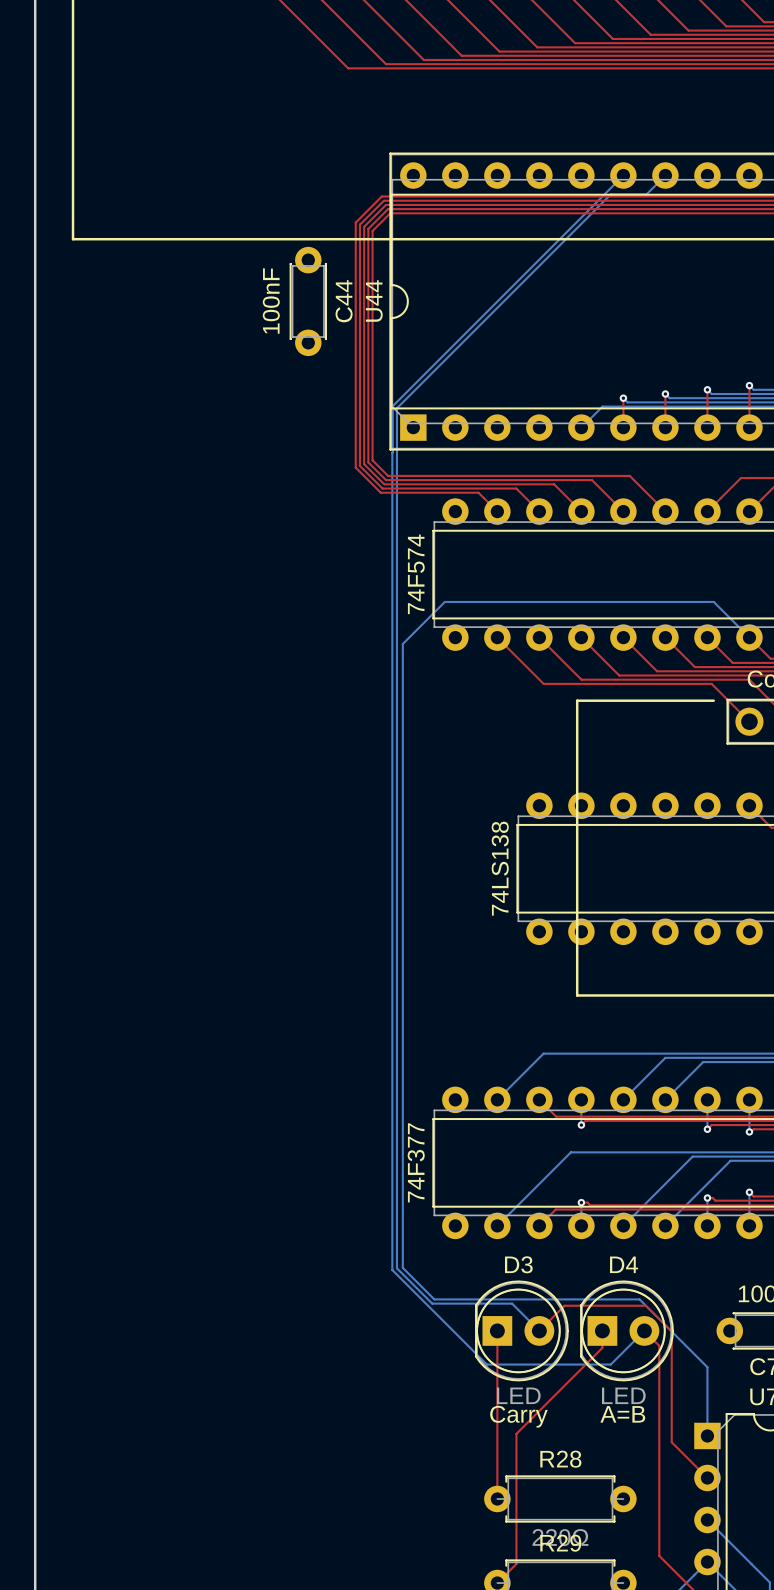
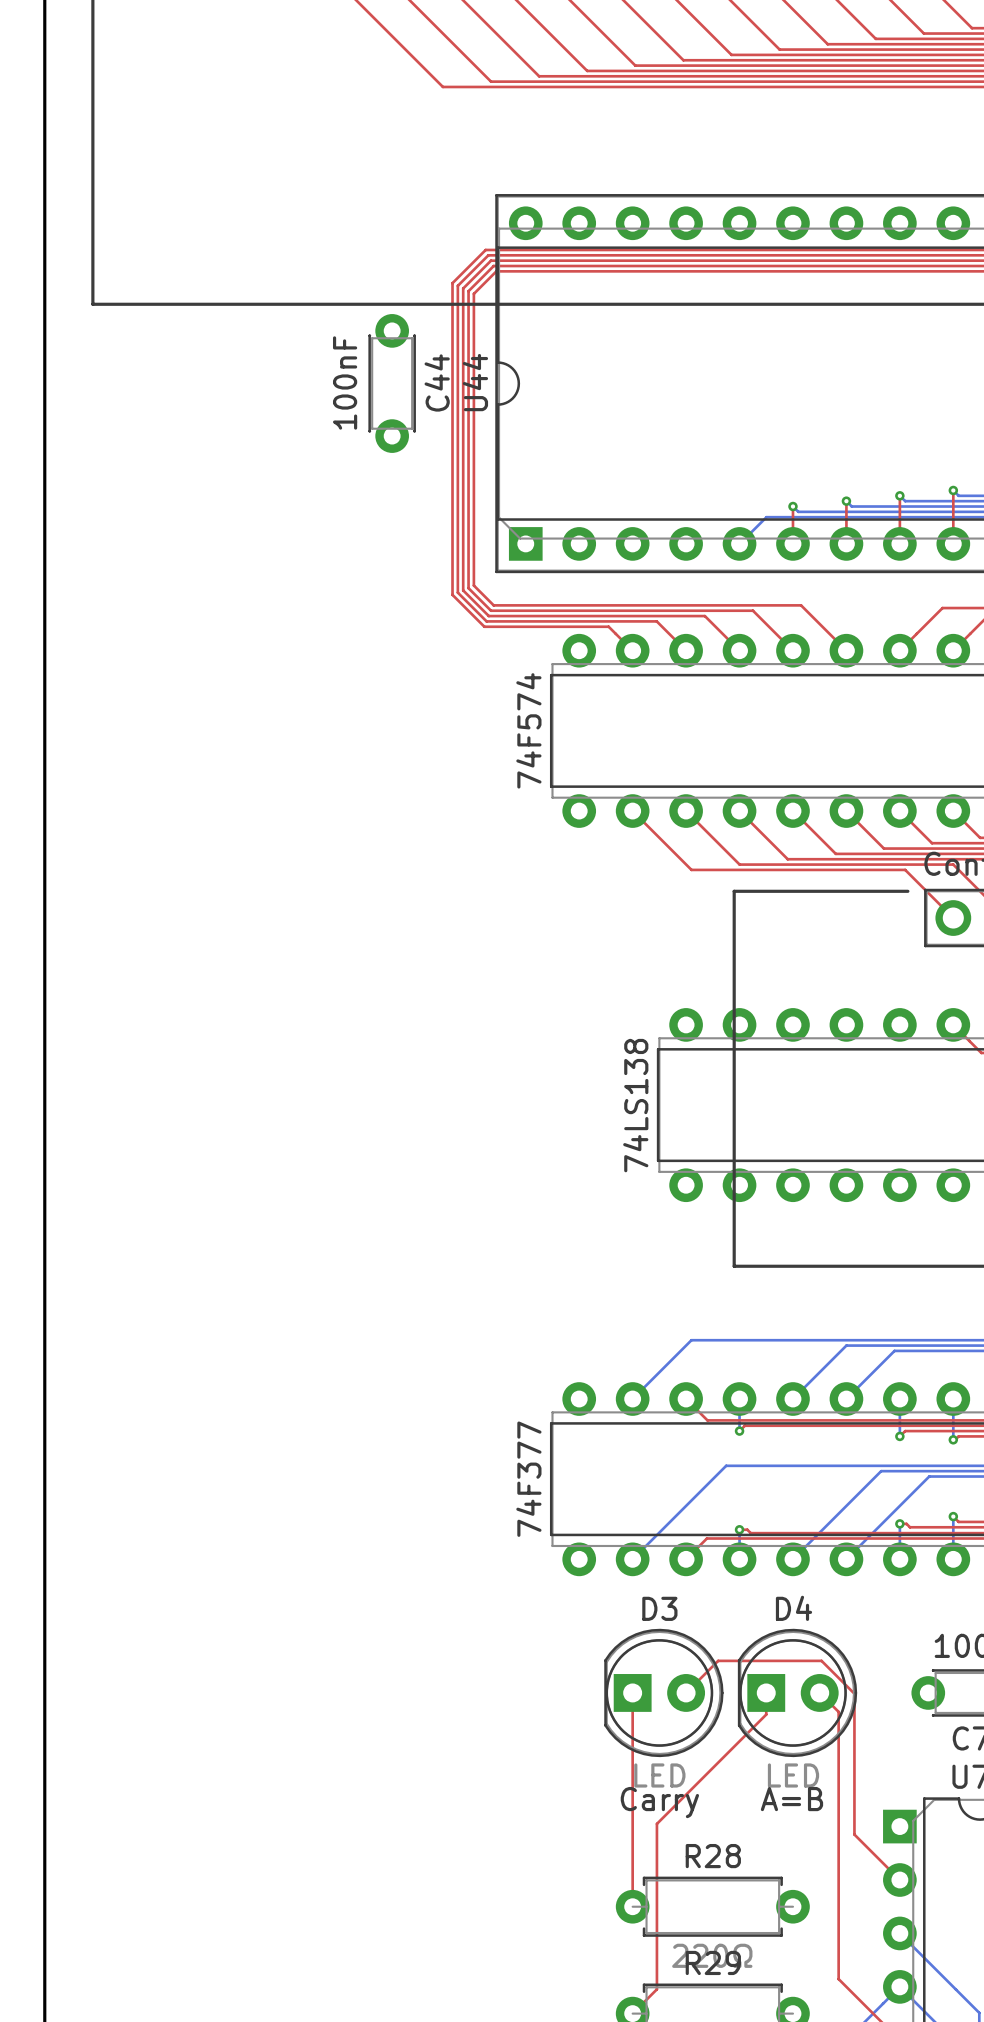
bottom track: (623, 175) (392, 406) (392, 1270) (486, 1364) (610, 1364) (644, 1330) -> none
bottom track: (665, 175) (646, 194) (610, 194) (396, 408) (396, 1268) (432, 1303) (512, 1303) (539, 1330) -> none
bottom track: (749, 637) (713, 601) (444, 601) (402, 643) (402, 1267) (434, 1299) (639, 1299) (707, 1367) (707, 1435) -> none

